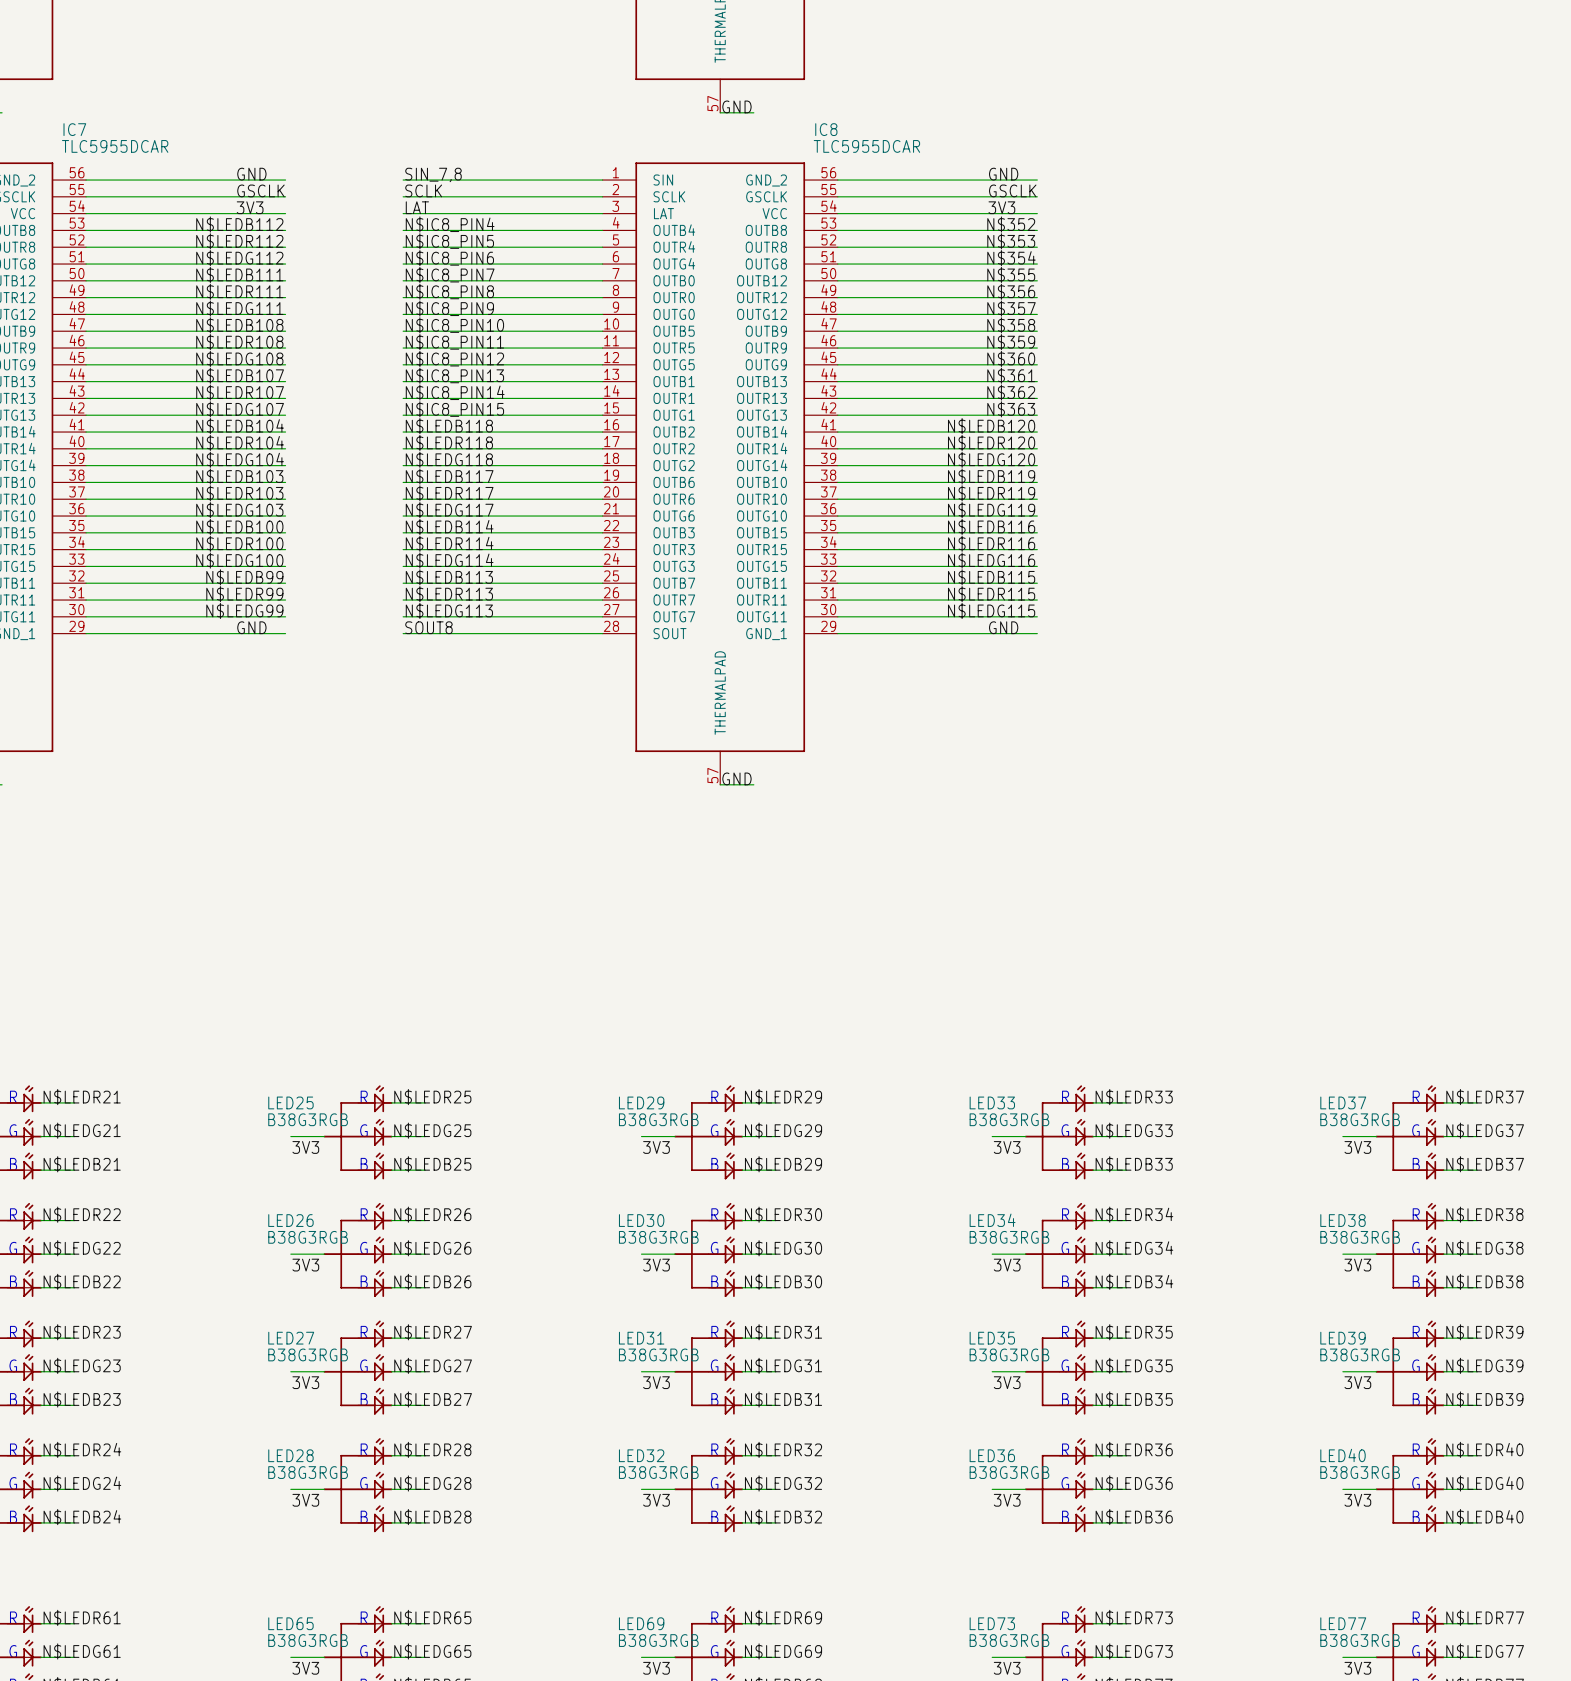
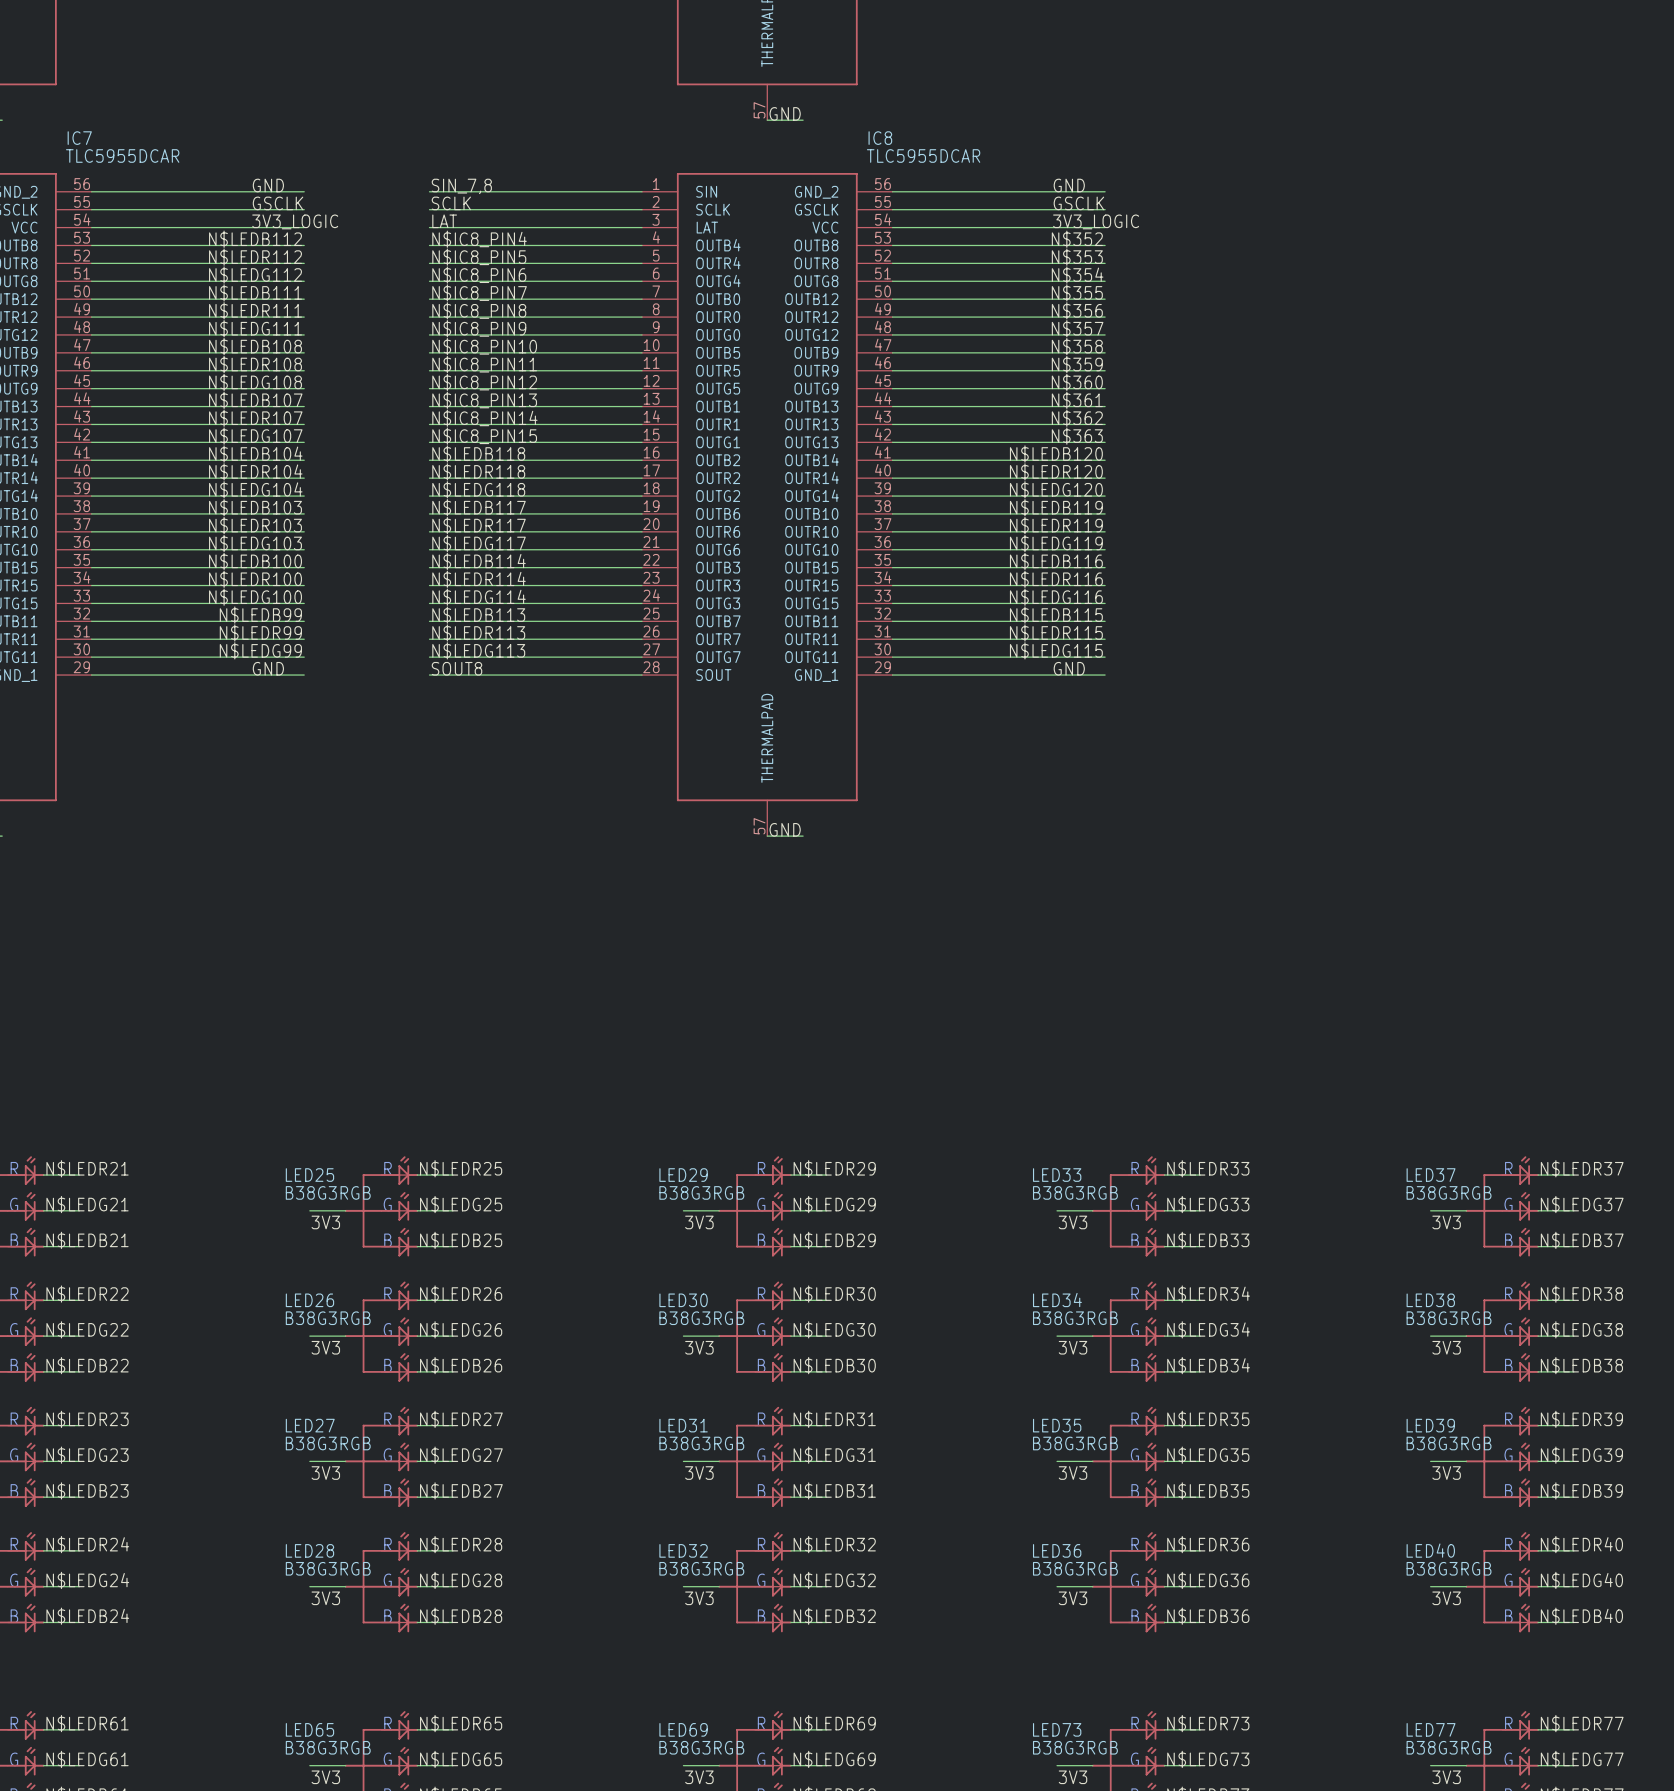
label: 3V3 (250, 207) -> 3V3_LOGIC (295, 221)
label: 3V3 (1001, 207) -> 3V3_LOGIC (1096, 221)

